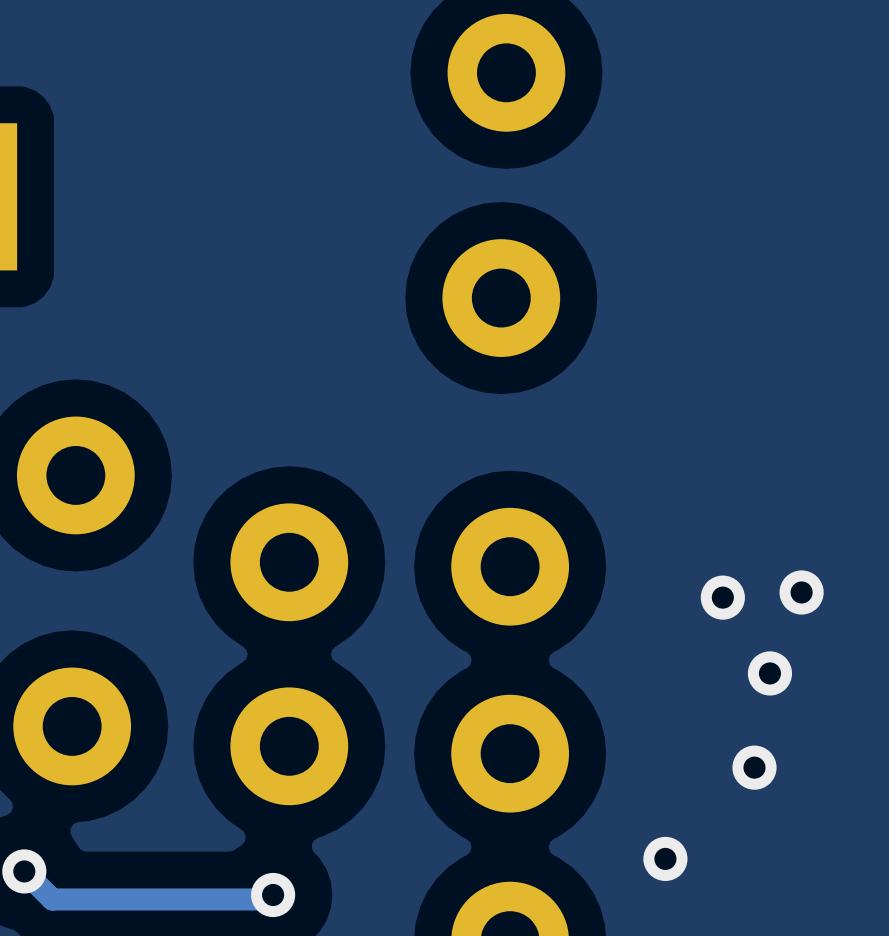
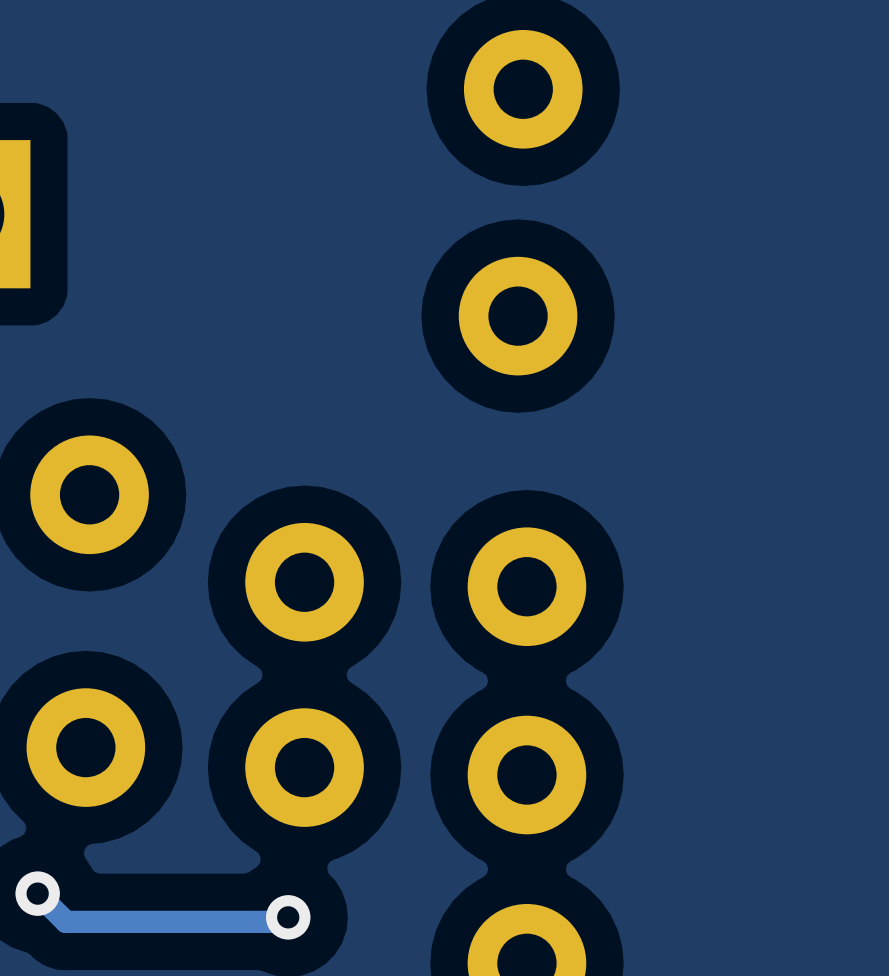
via: (801, 592) -> none
via: (722, 597) -> none
via: (769, 673) -> none
via: (754, 767) -> none
via: (665, 858) -> none

